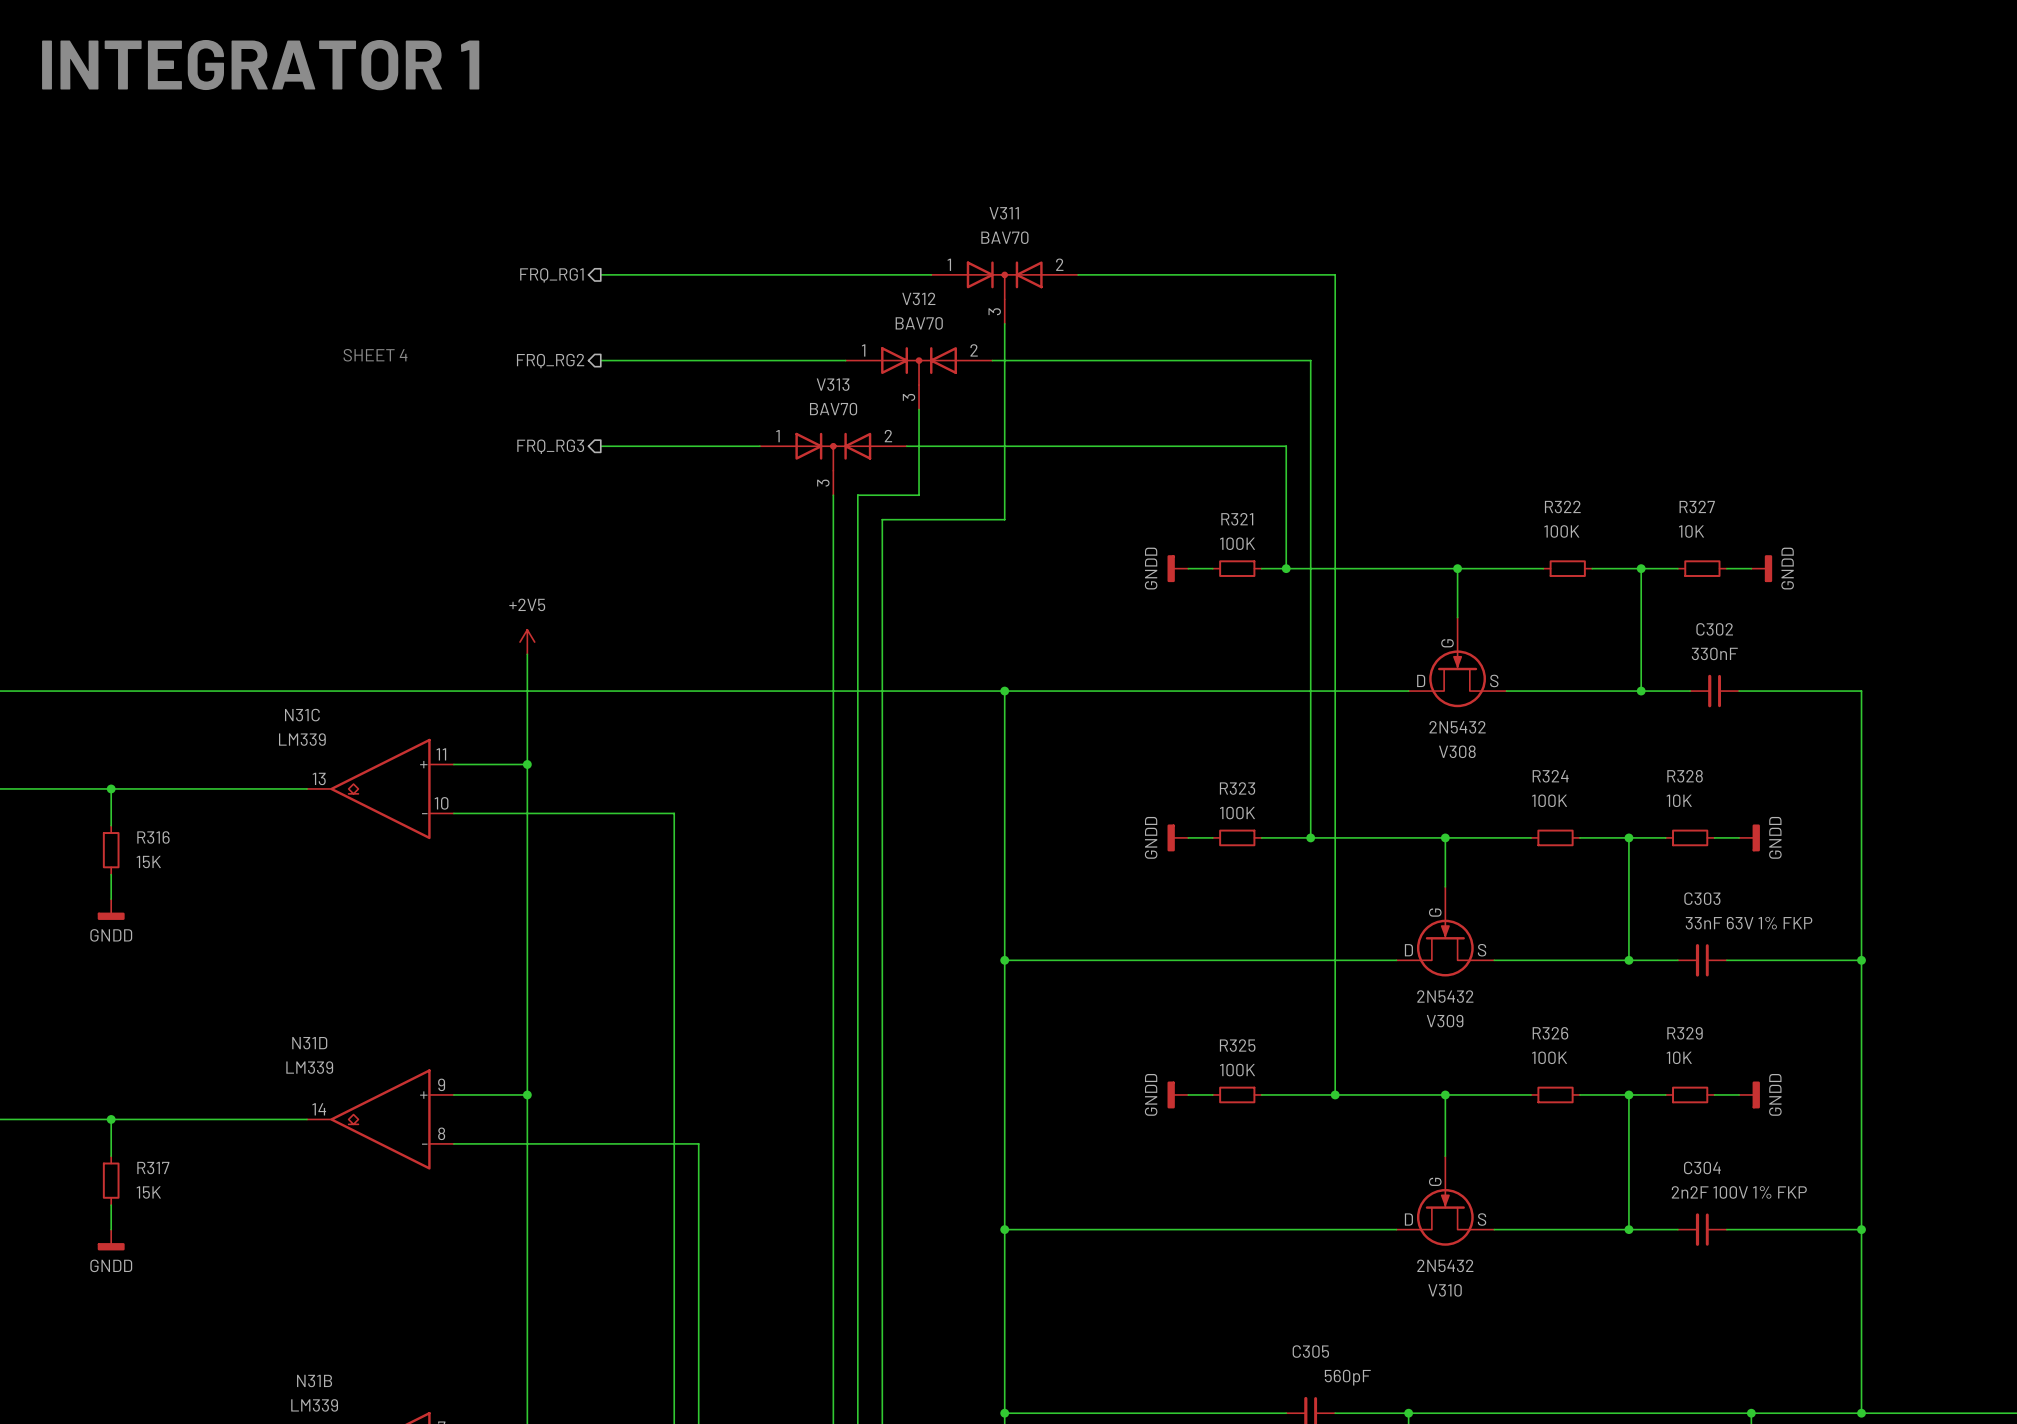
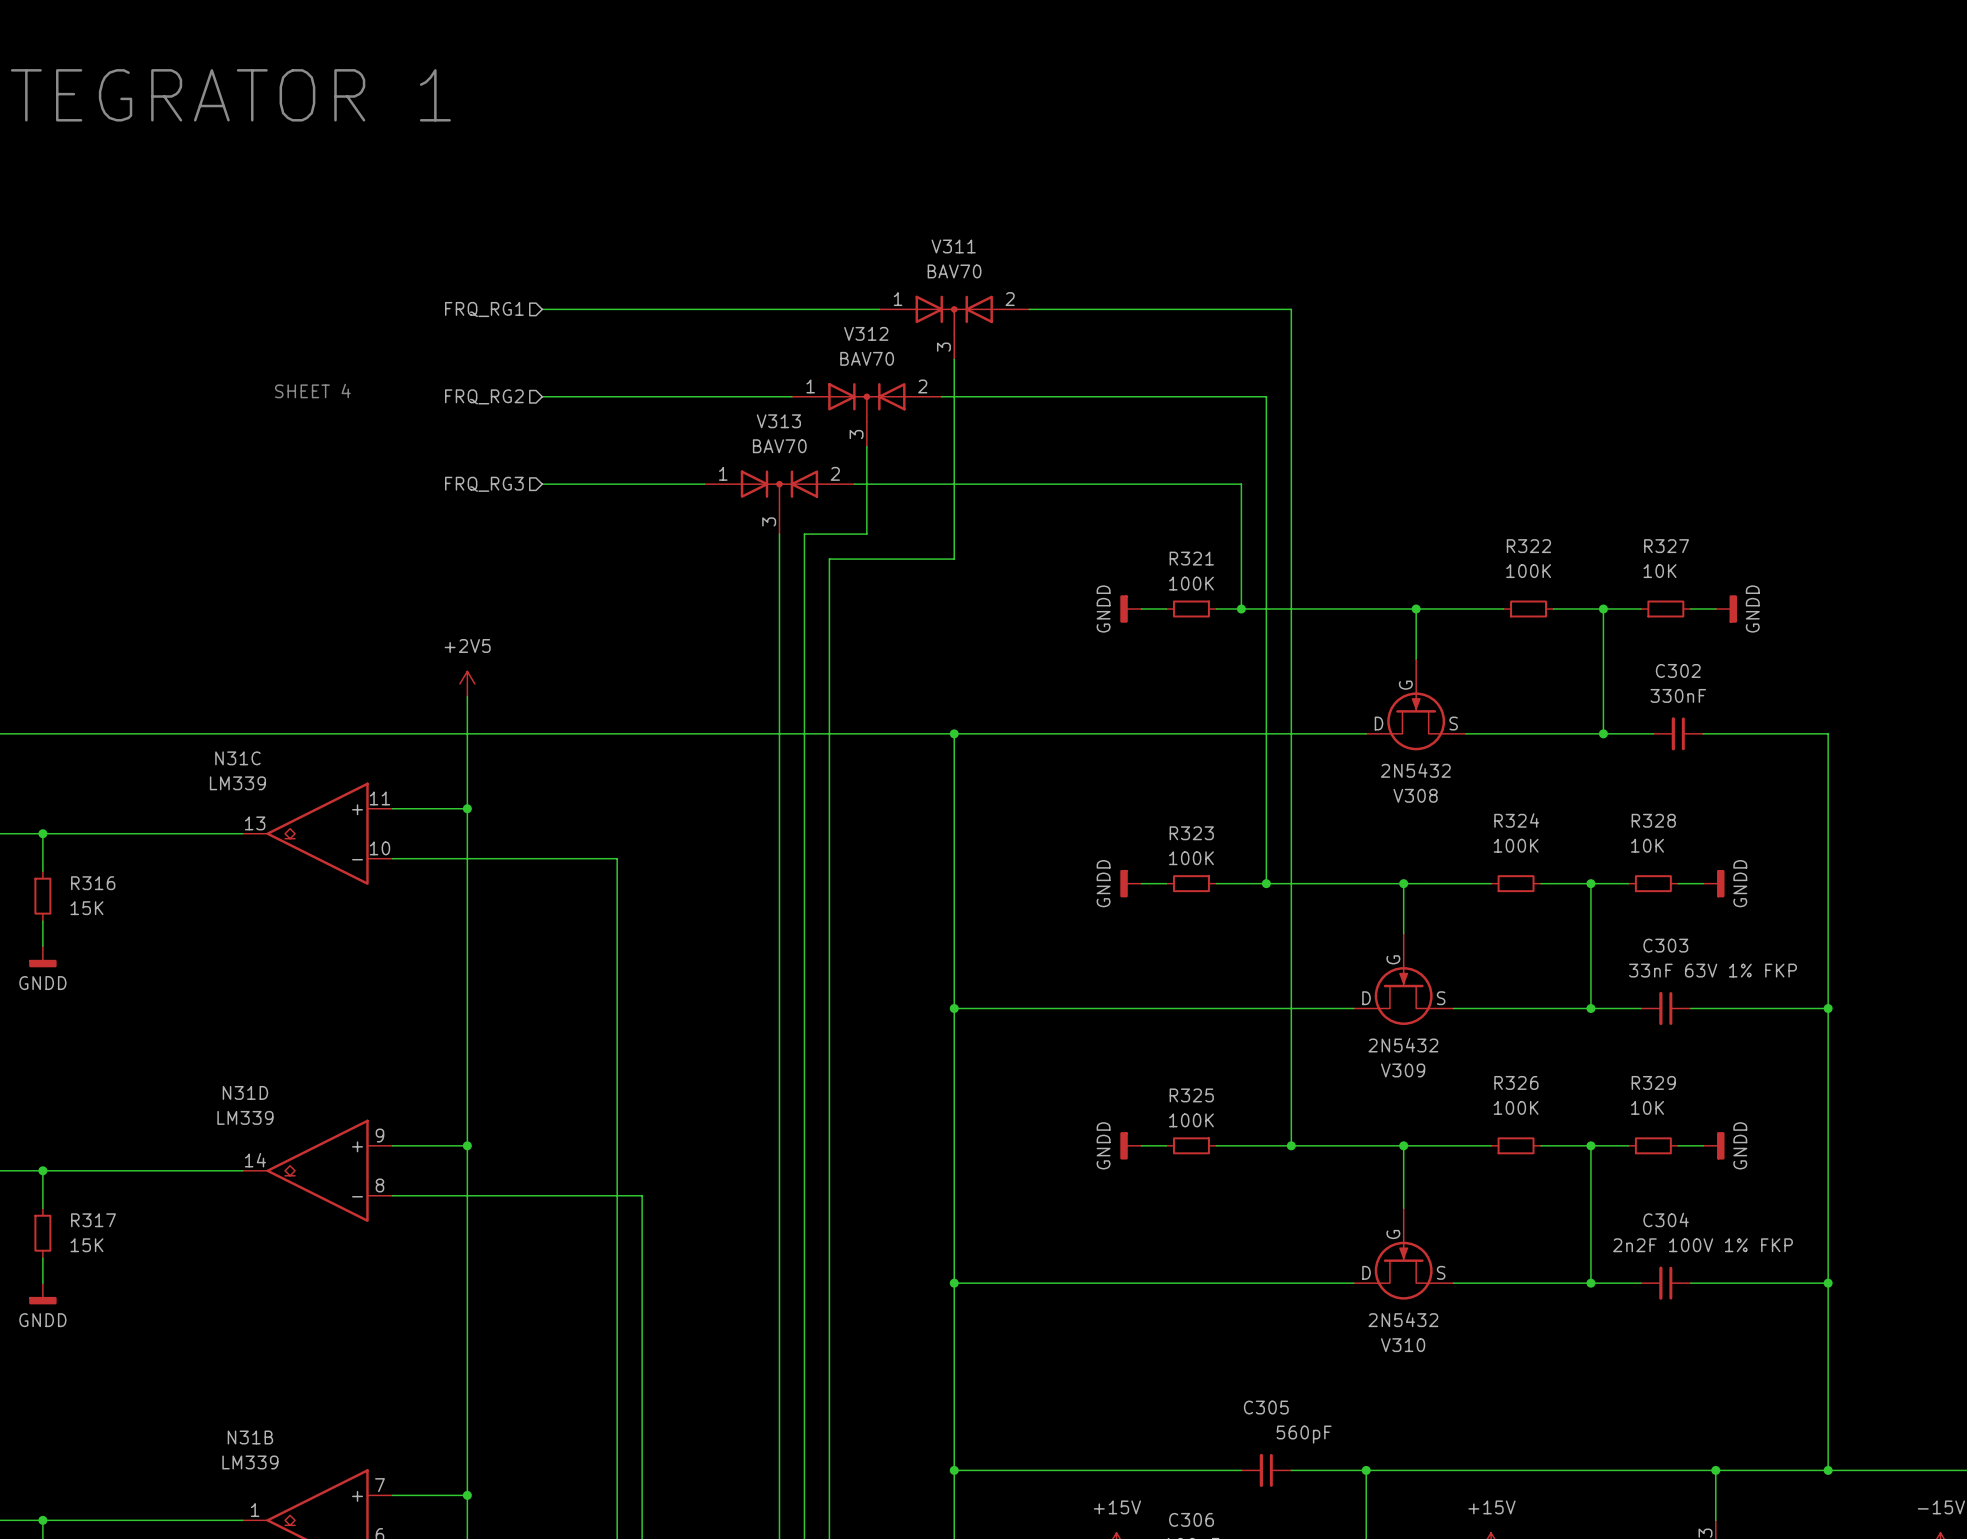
hierarchical label shape: output (551, 275) -> input (484, 309)
hierarchical label shape: output (550, 361) -> input (484, 396)
hierarchical label shape: output (550, 446) -> input (484, 484)

